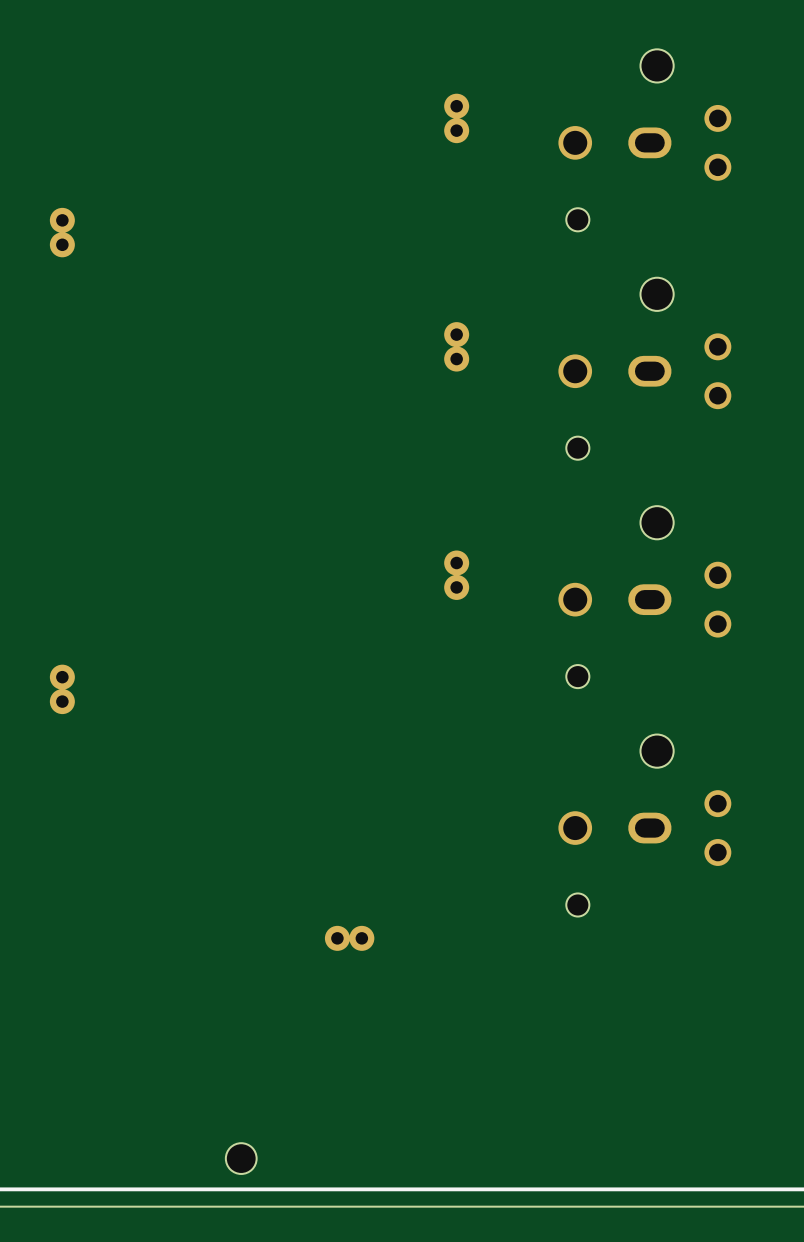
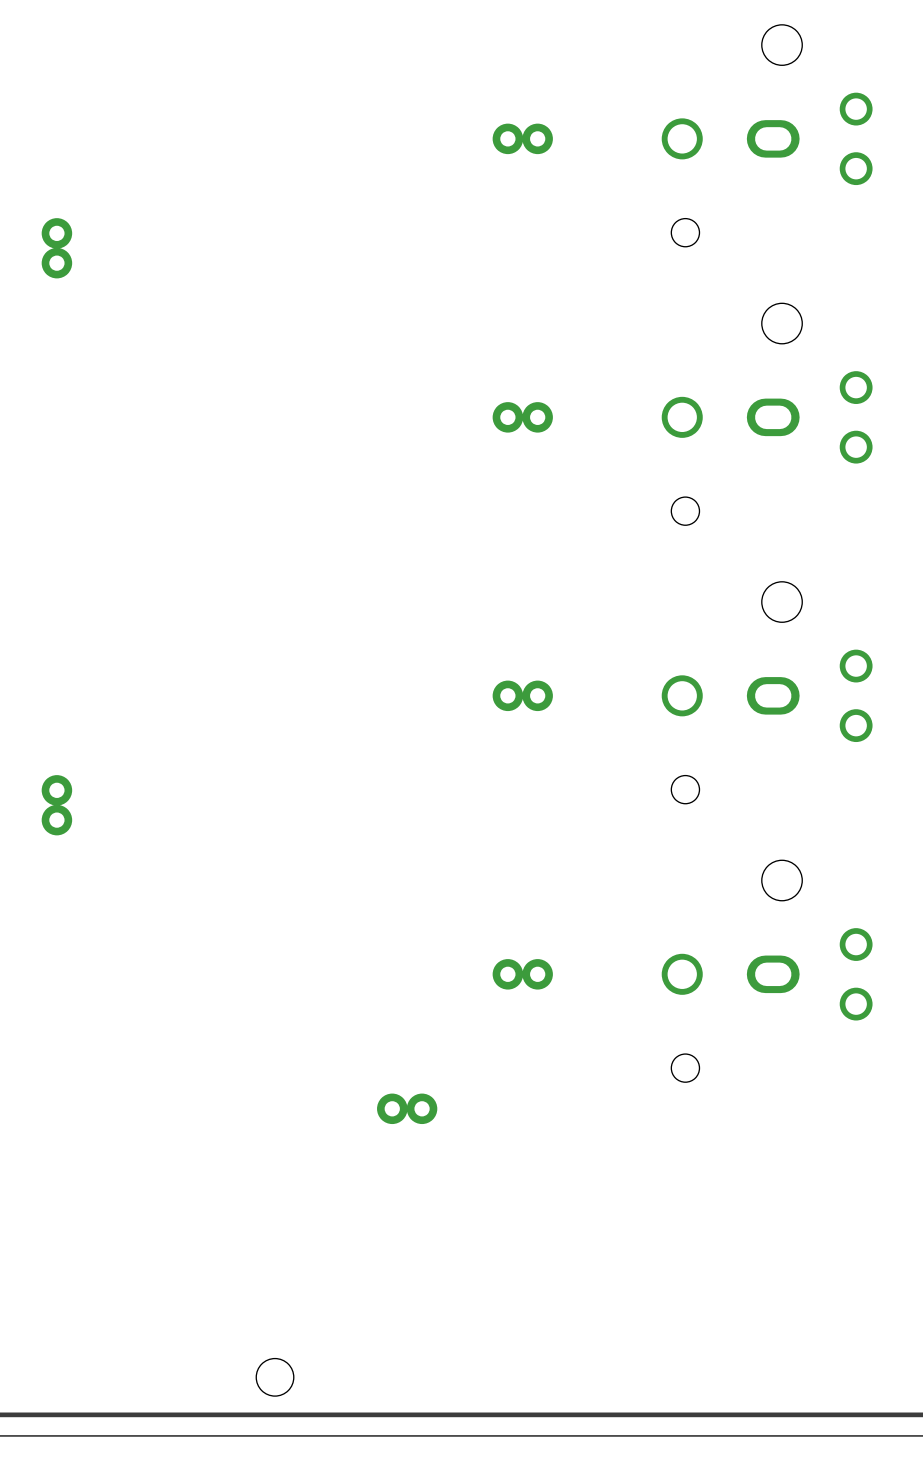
part rotation: 0° (456, 118) -> 90° clockwise (522, 138)
part rotation: 0° (456, 346) -> 90° clockwise (522, 417)
part rotation: 0° (456, 575) -> 90° clockwise (522, 695)
part: none -> (522, 974)

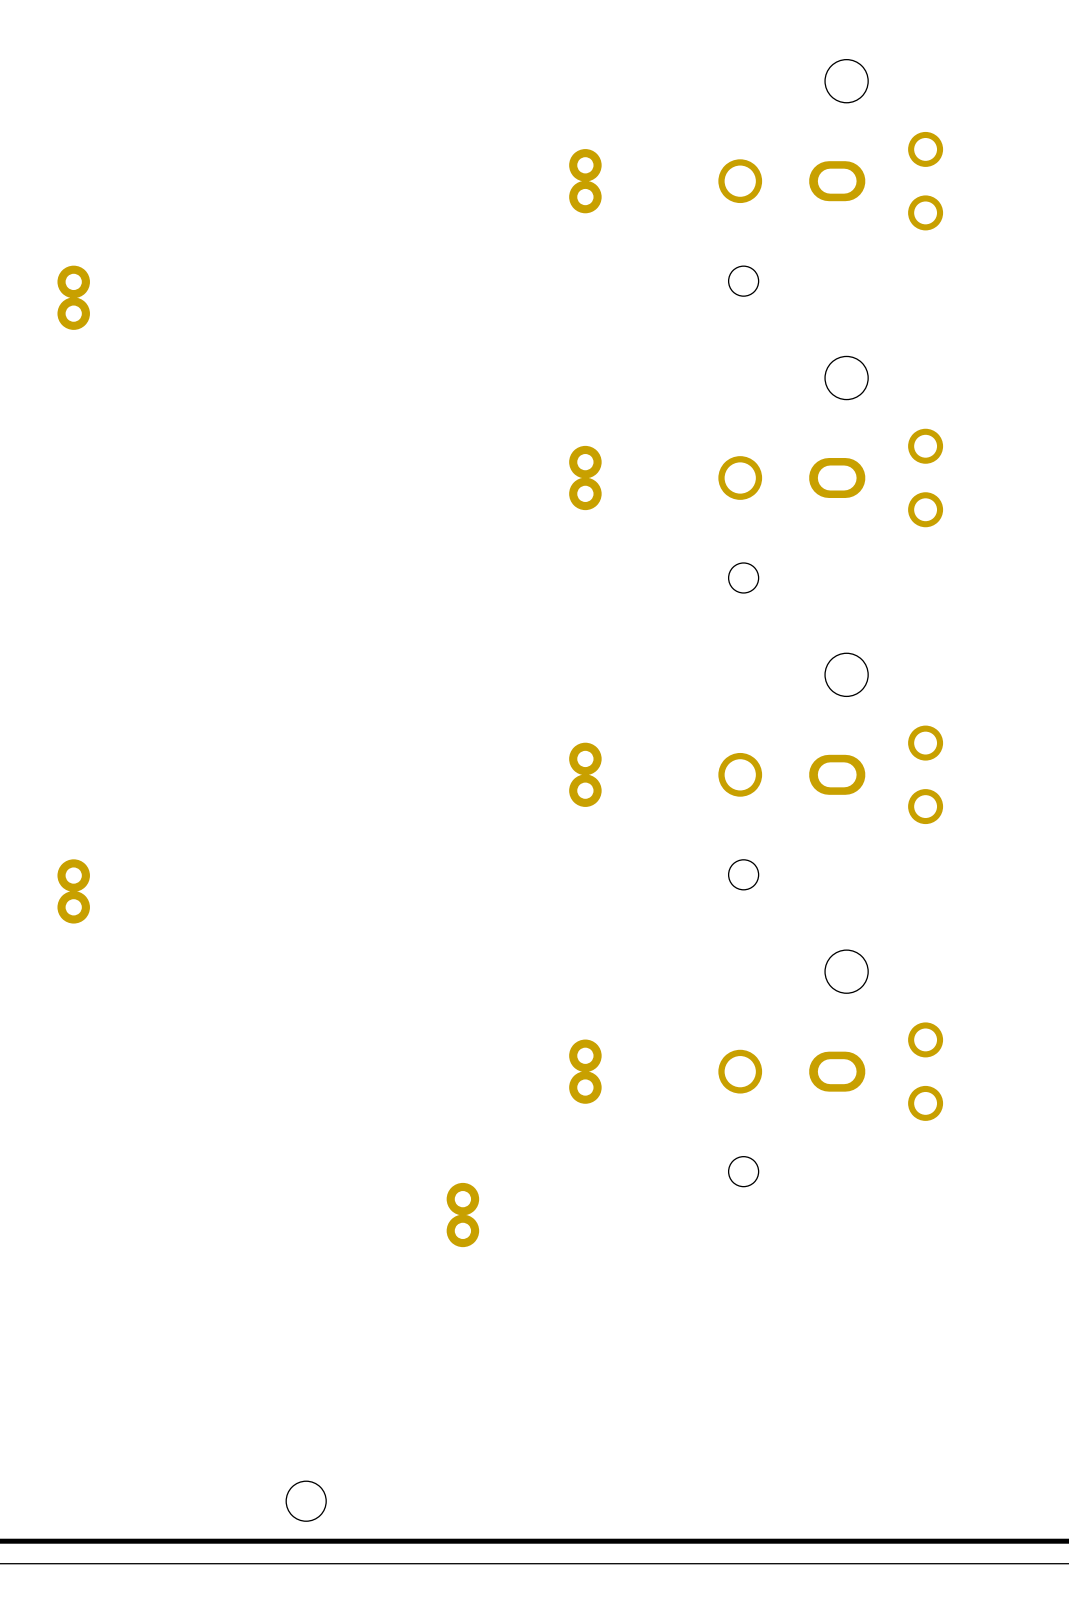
part rotation: 0° (522, 138) -> 90° clockwise (585, 181)
part rotation: 0° (522, 417) -> 90° clockwise (585, 478)
part rotation: 0° (522, 695) -> 90° clockwise (585, 774)
part rotation: 0° (522, 974) -> 90° clockwise (585, 1071)
part rotation: 0° (407, 1108) -> 90° clockwise (462, 1215)

